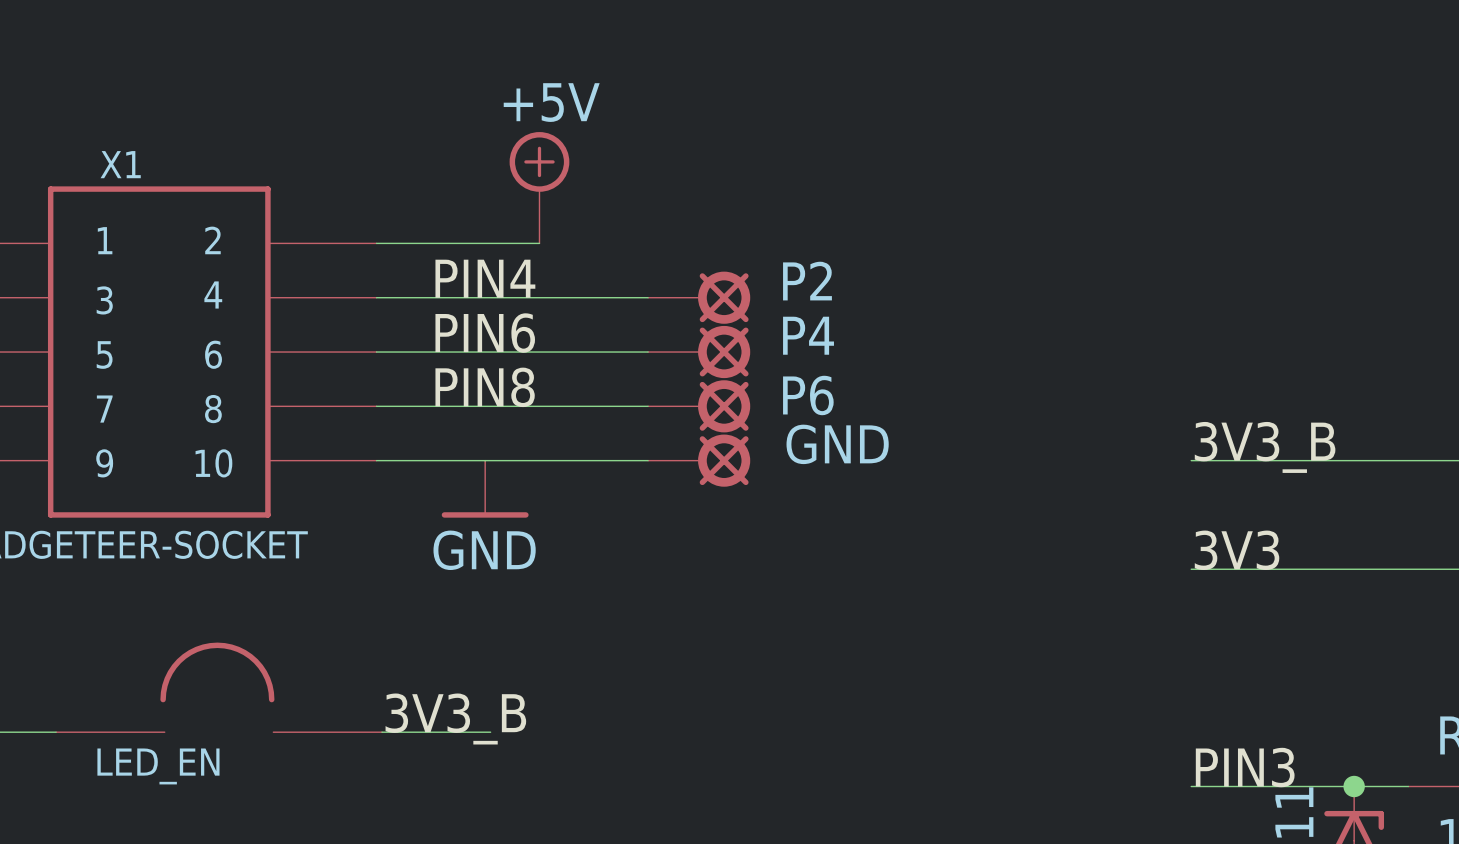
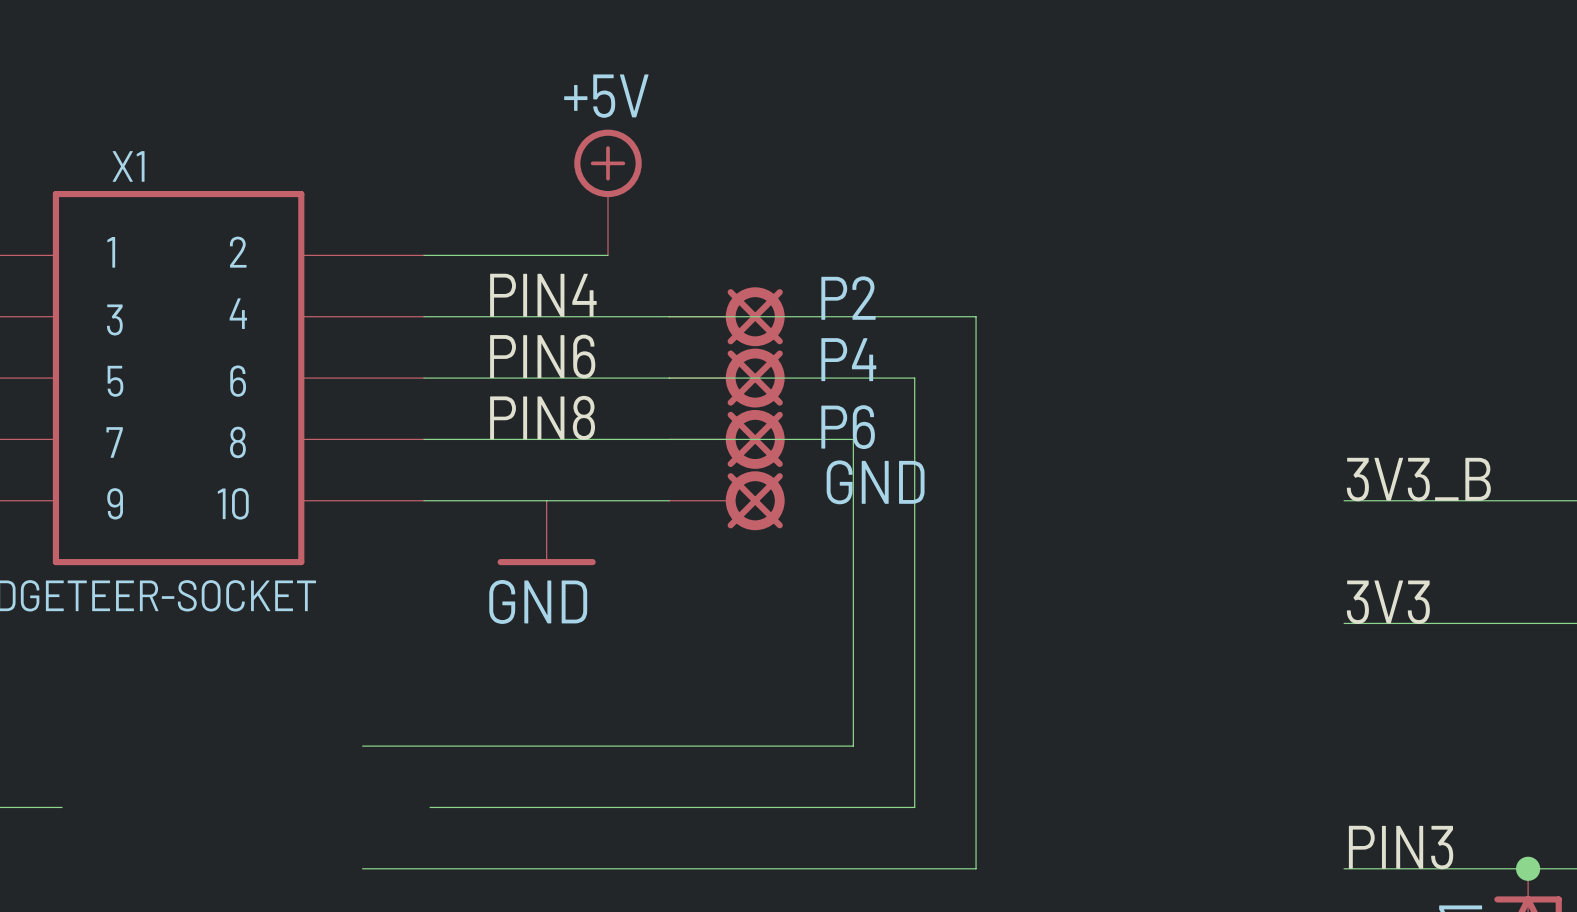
wire: none -> (730, 316) (976, 316) (976, 868) (362, 868)
P2 position: (699, 297) -> (726, 316)
wire: none -> (730, 378) (914, 378) (914, 807) (552, 807)
P4 position: (699, 352) -> (726, 378)
wire: none -> (730, 439) (853, 439) (853, 746) (362, 746)
P6 position: (699, 406) -> (726, 439)
GND position: (699, 460) -> (726, 500)
LED_EN: (219, 687) -> none
label: 3V3_B (455, 718) -> none

